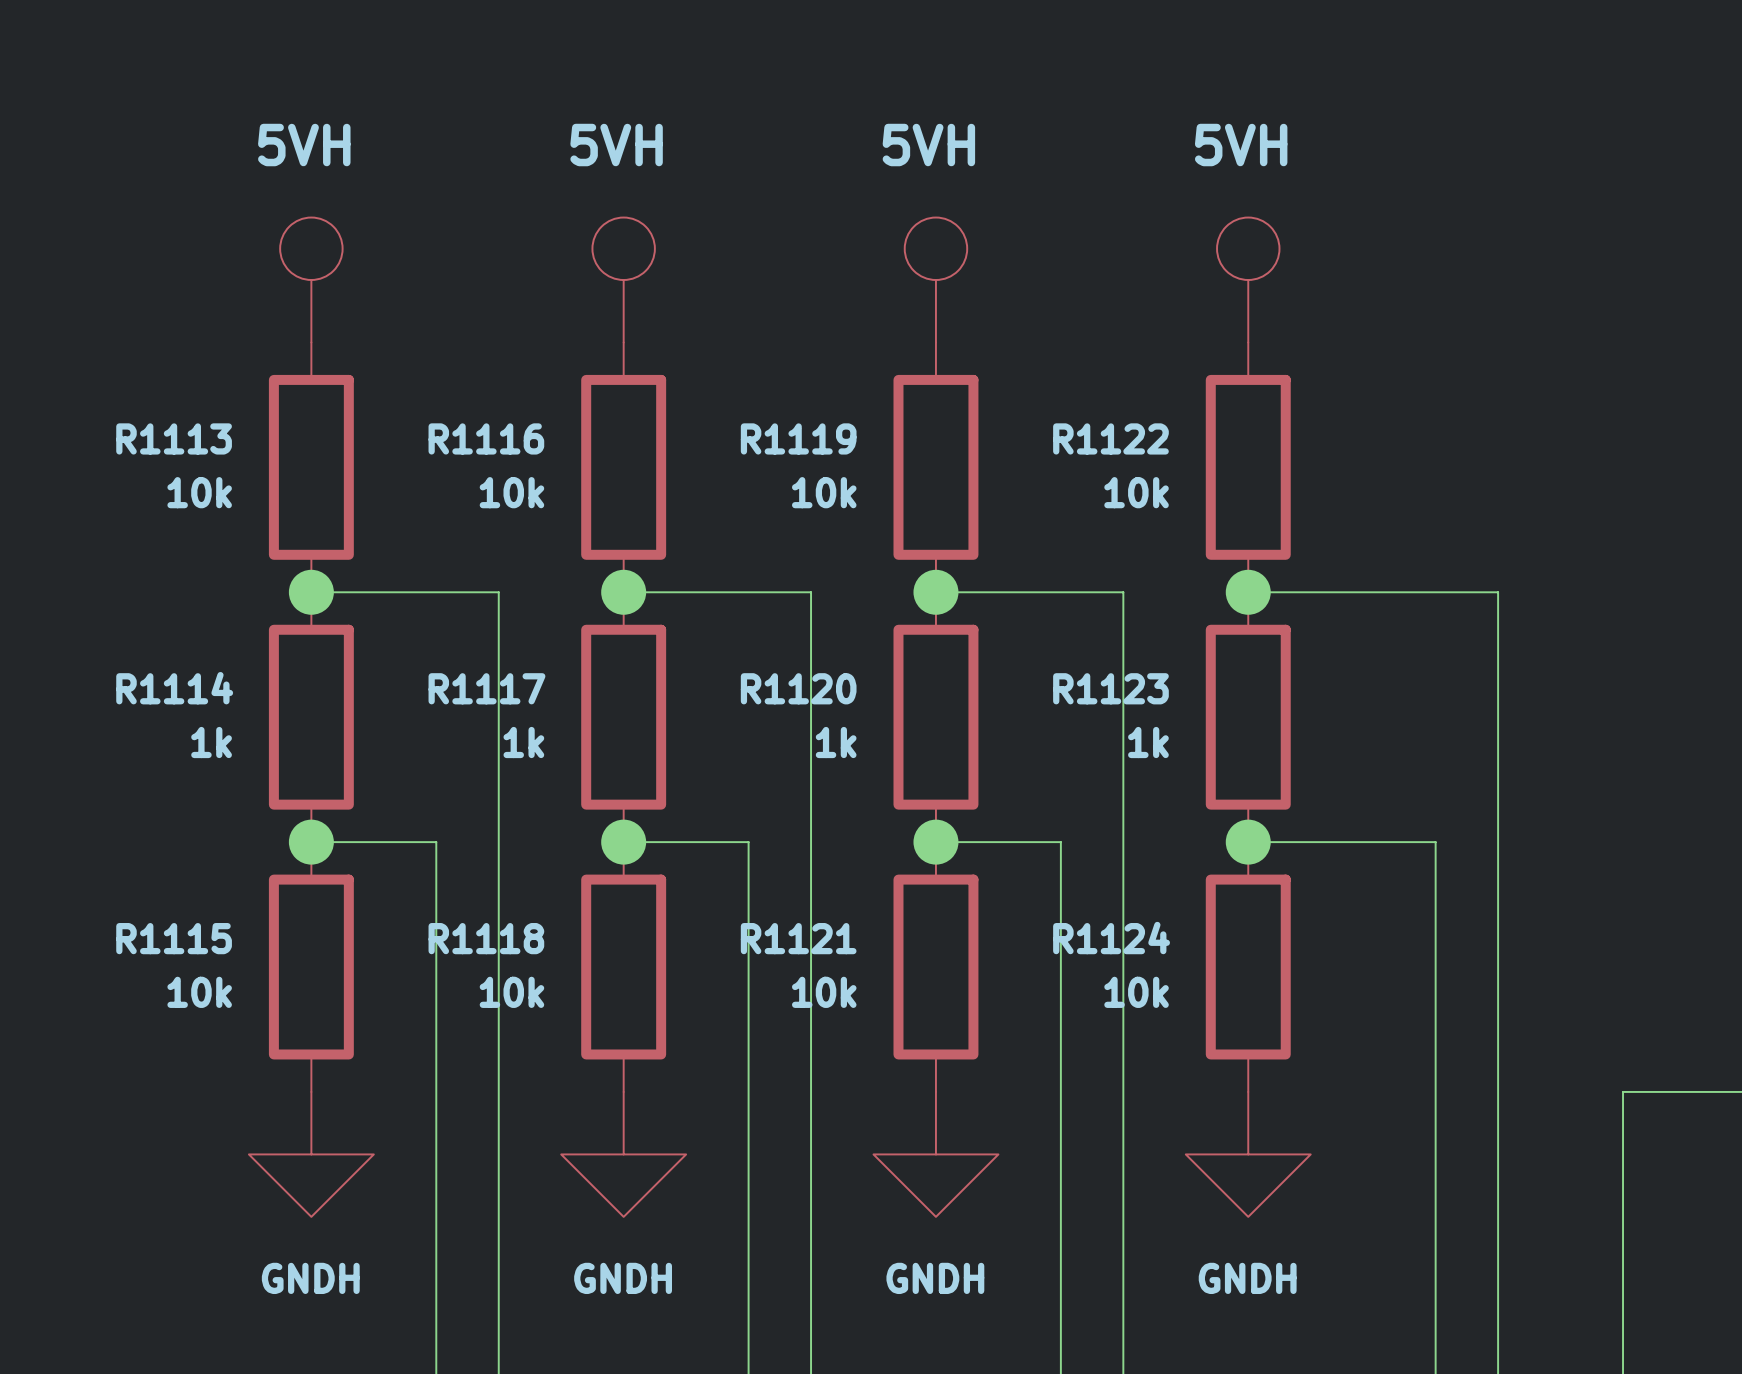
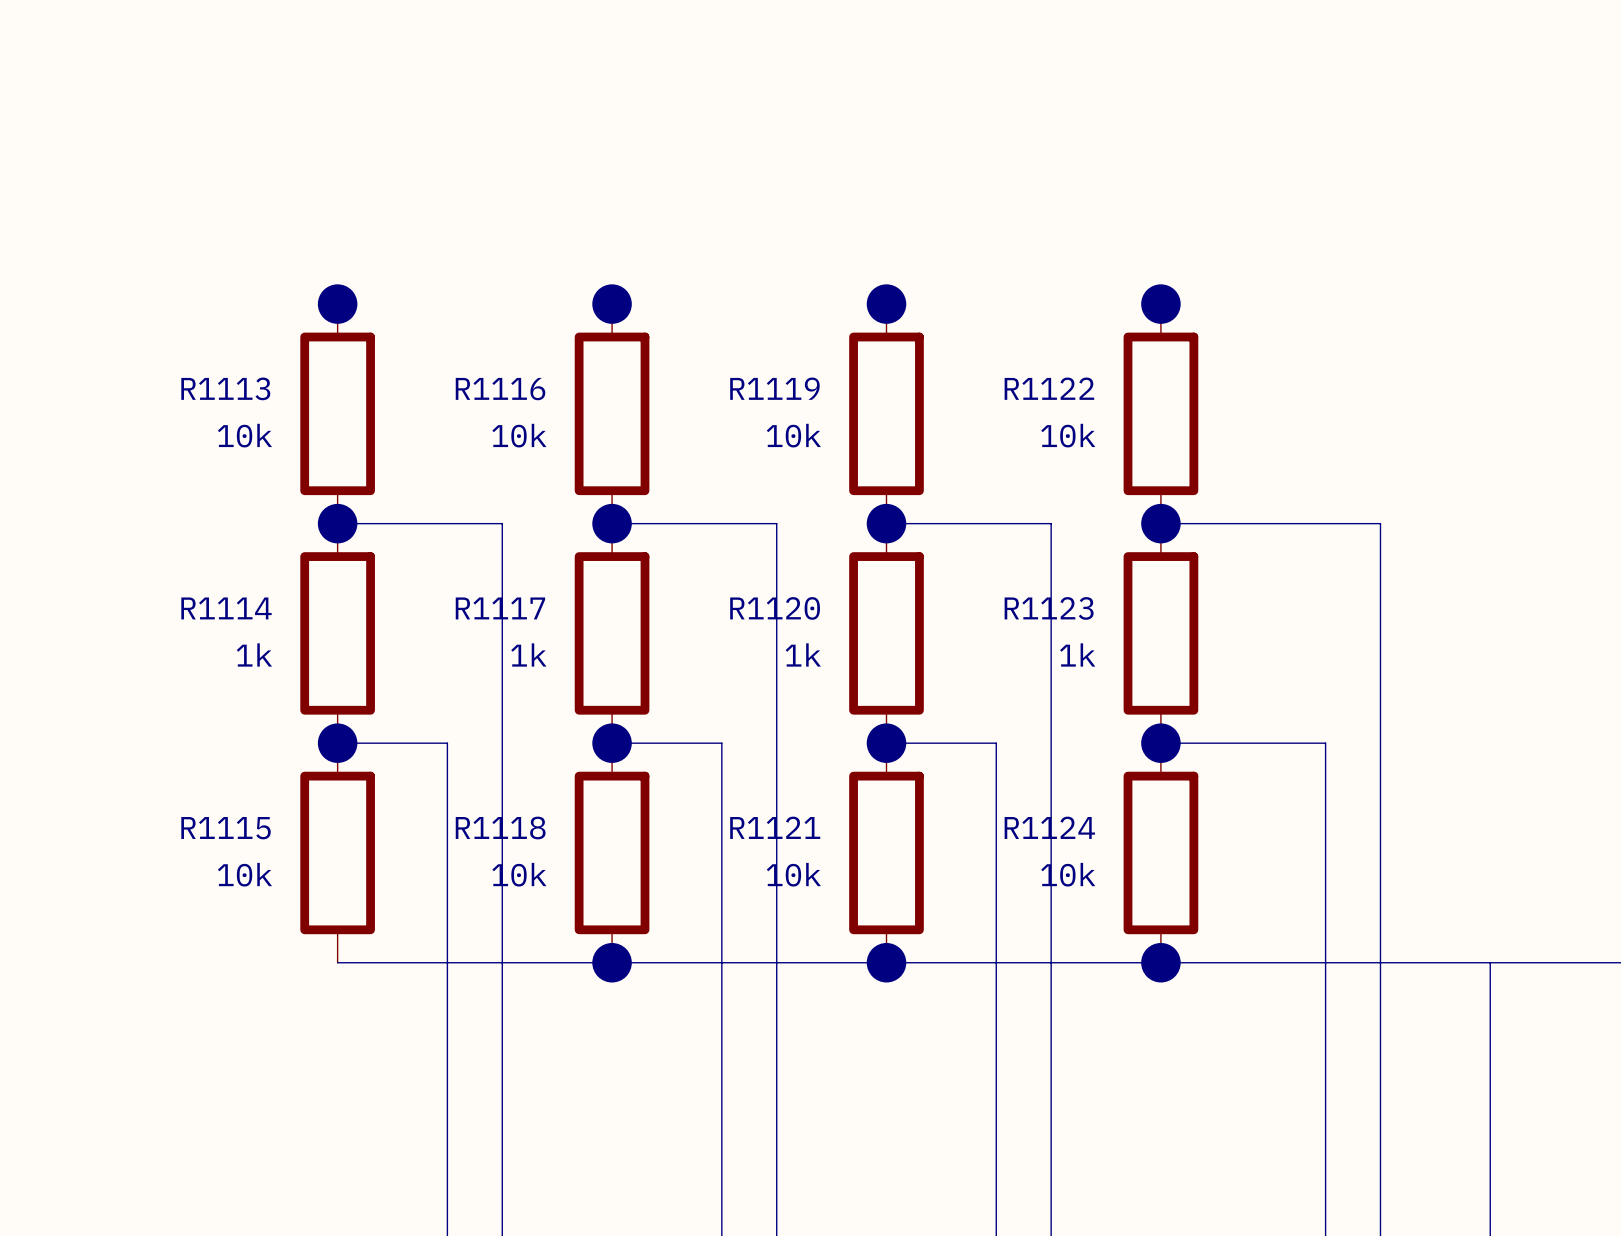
power symbol: 5VH (311, 279) -> none
power symbol: 5VH (623, 279) -> none
power symbol: 5VH (935, 279) -> none
power symbol: 5VH (1248, 279) -> none
junction: none -> (337, 304)
junction: none -> (612, 304)
junction: none -> (886, 304)
junction: none -> (1160, 304)
wire: none -> (337, 962) (1490, 962)
junction: none -> (612, 962)
junction: none -> (886, 962)
junction: none -> (1160, 962)
power symbol: GNDH (311, 1154) -> none
power symbol: GNDH (623, 1154) -> none
power symbol: GNDH (935, 1154) -> none
power symbol: GNDH (1248, 1154) -> none

